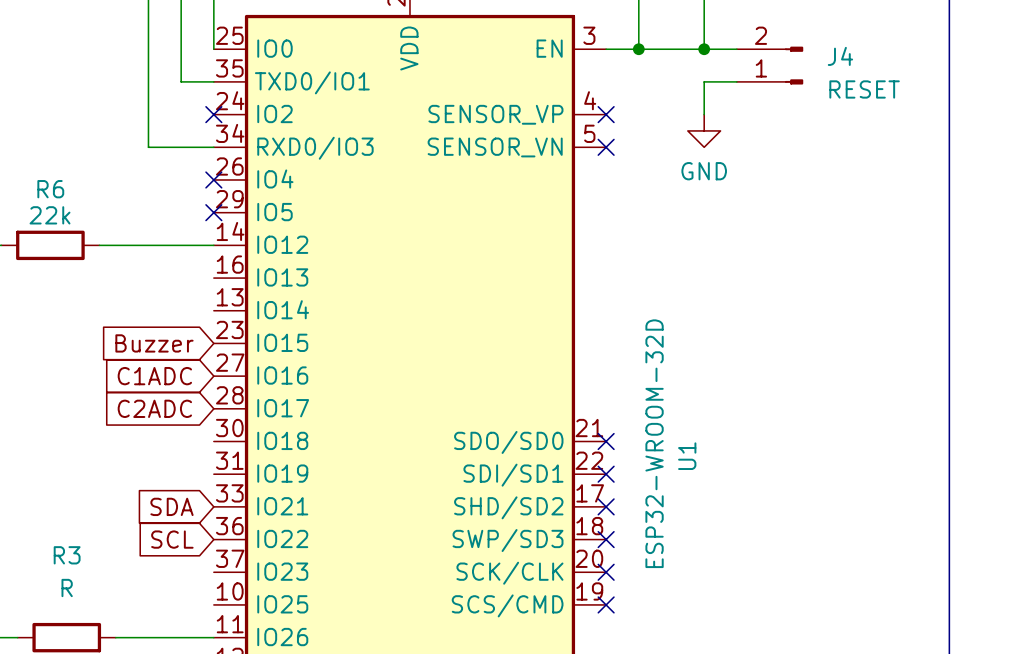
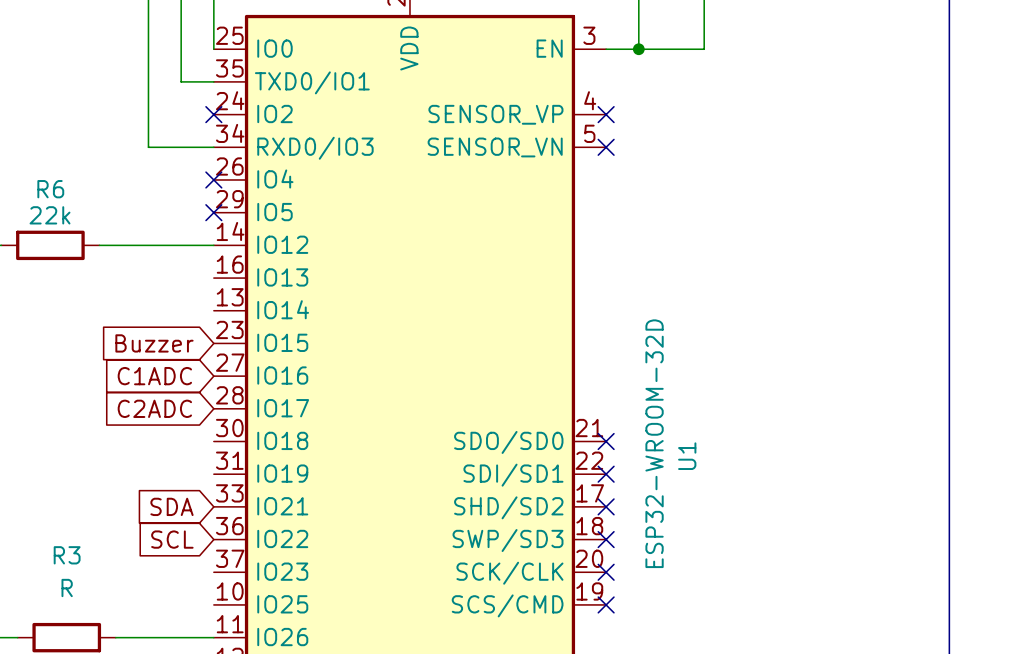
wire: (704, 49) (736, 49) -> none
junction: (704, 49) -> none
J4: RESET (770, 65) -> none
wire: (736, 81) (704, 81) (704, 114) -> none
power symbol: GND (704, 130) -> none

